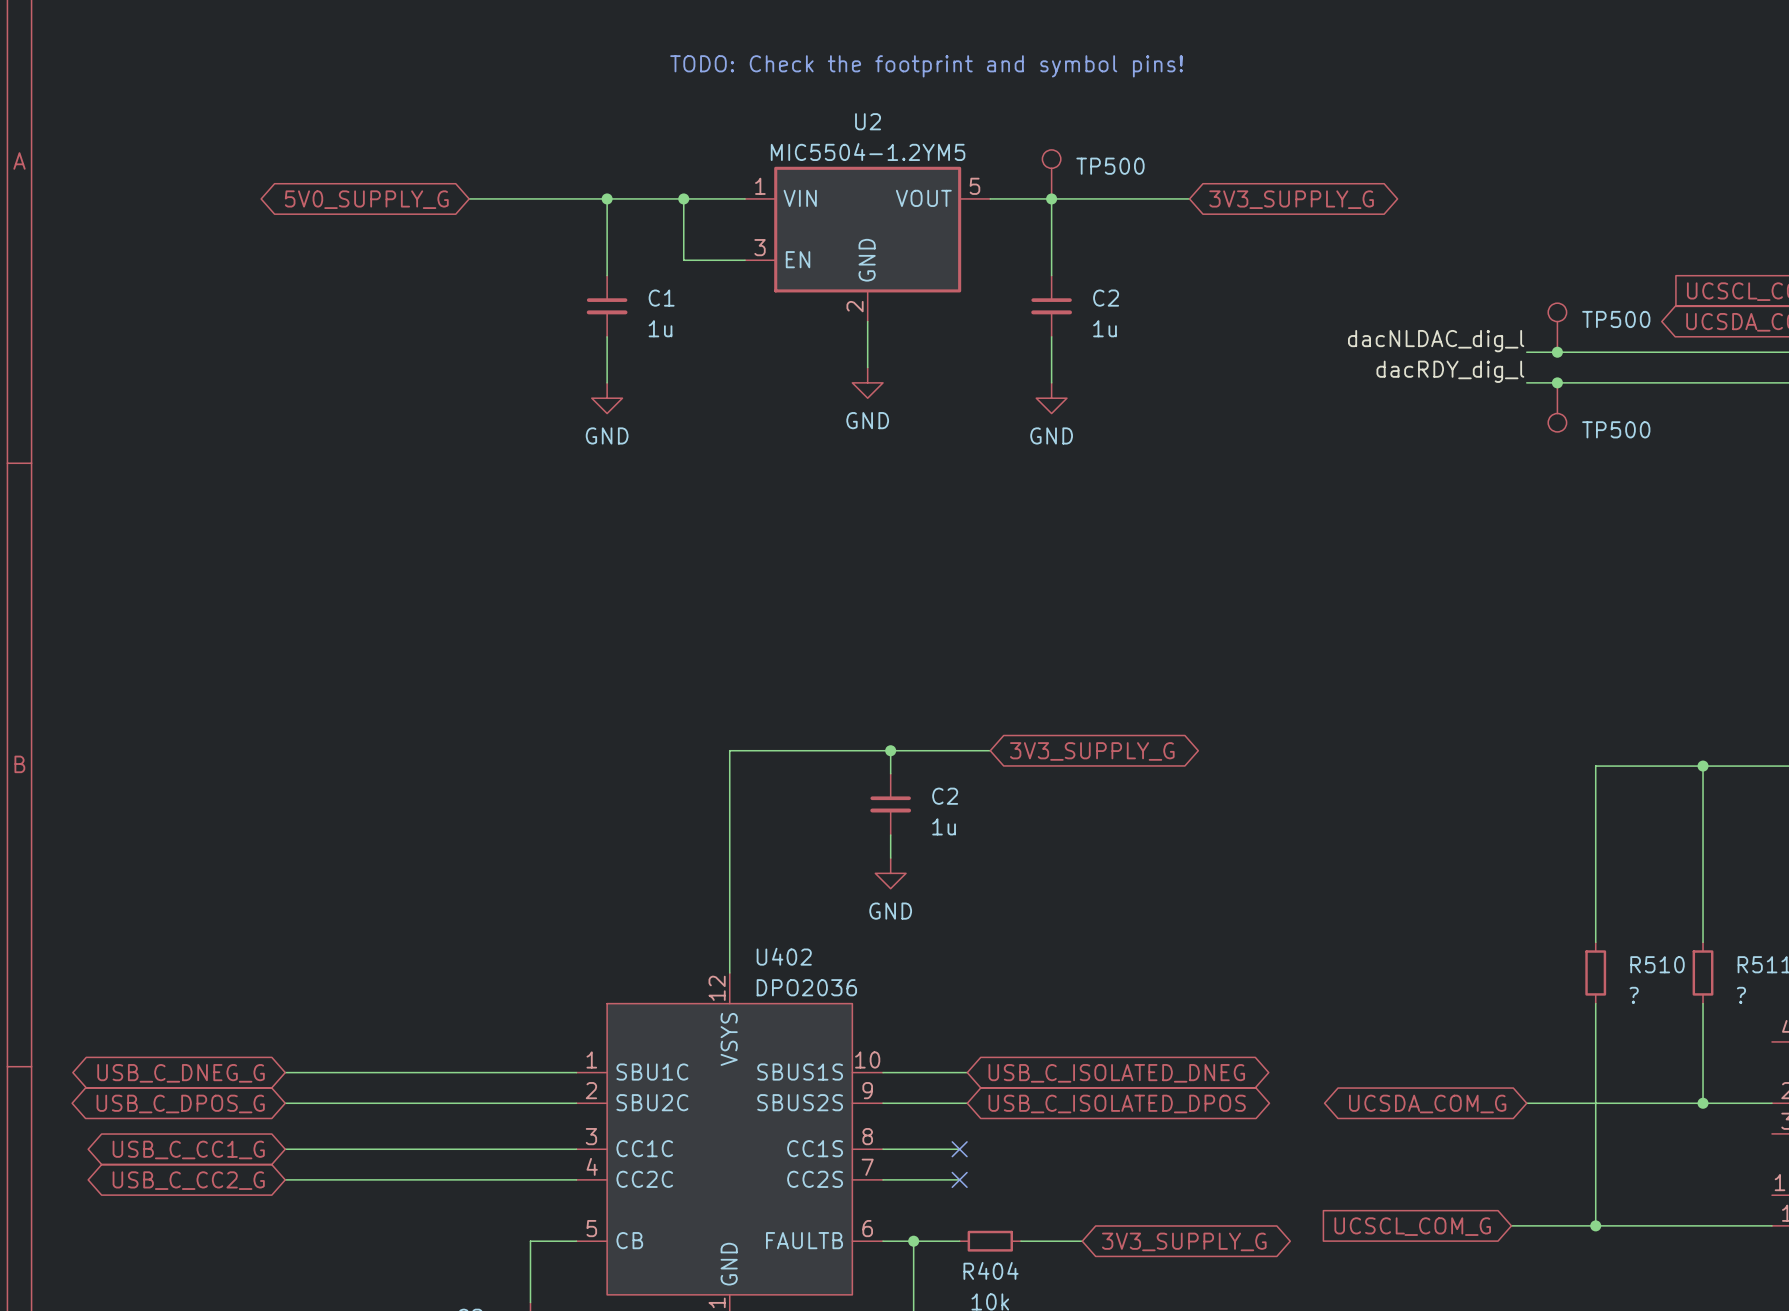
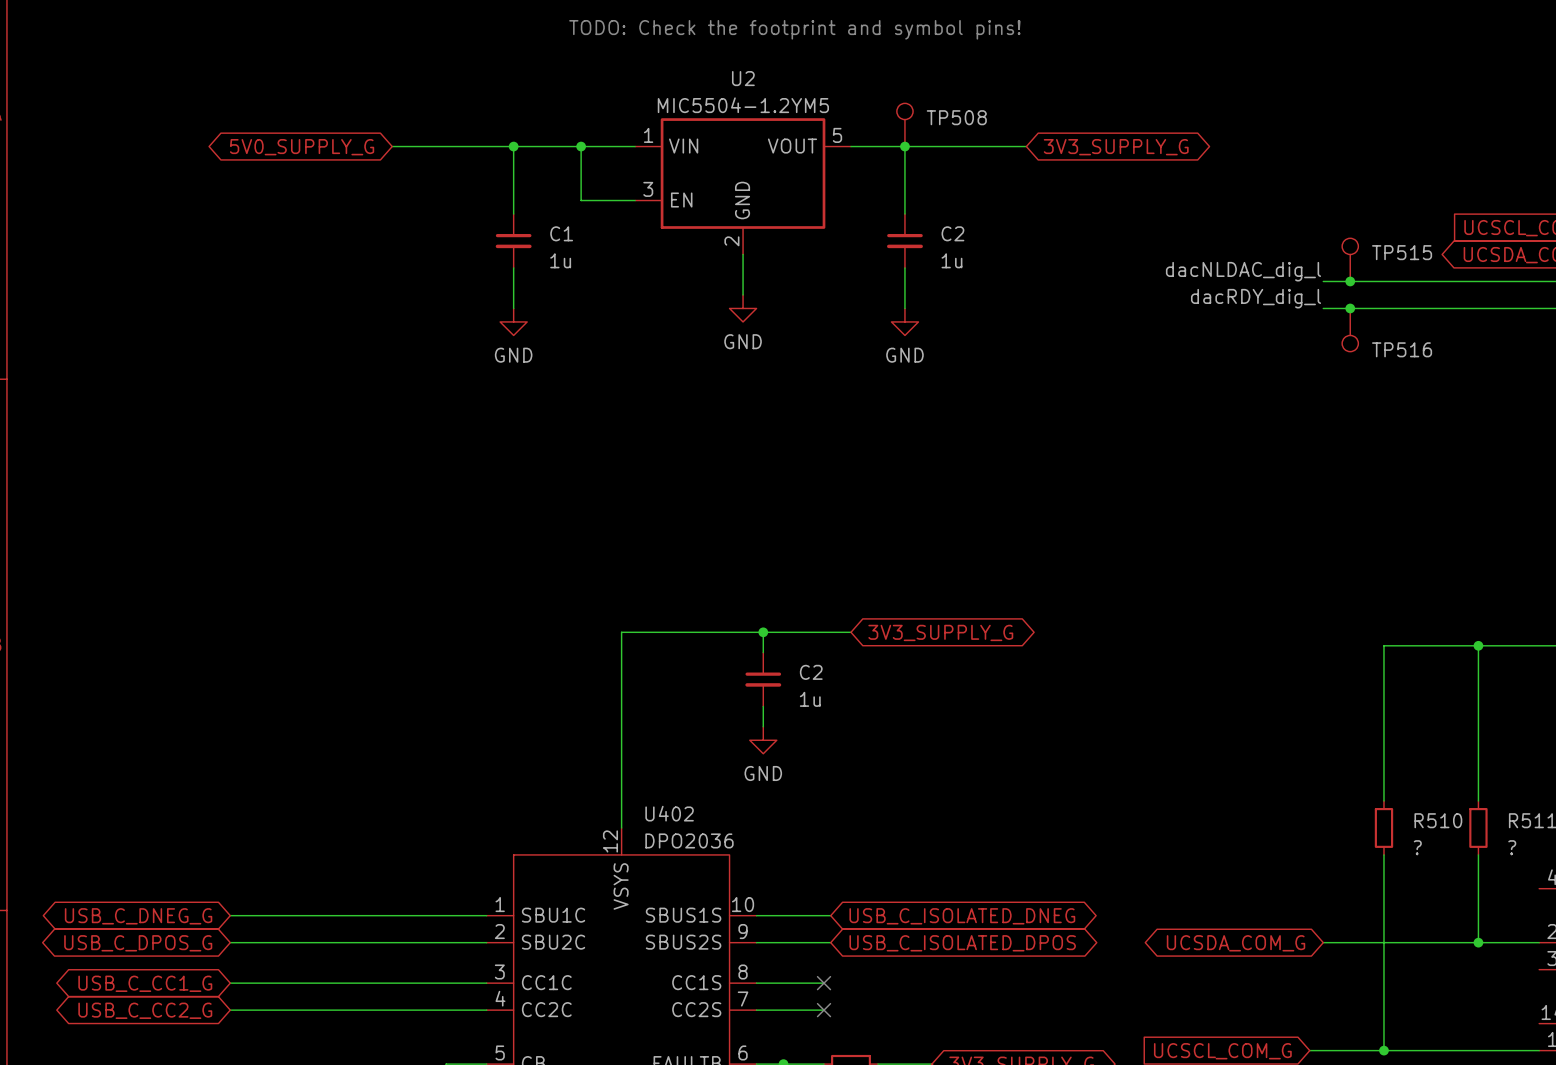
TP500 name: TP500 (1110, 166) -> TP508 (956, 117)
TP500 name: TP500 (1616, 319) -> TP515 (1402, 252)
TP500 name: TP500 (1616, 429) -> TP516 (1402, 349)

